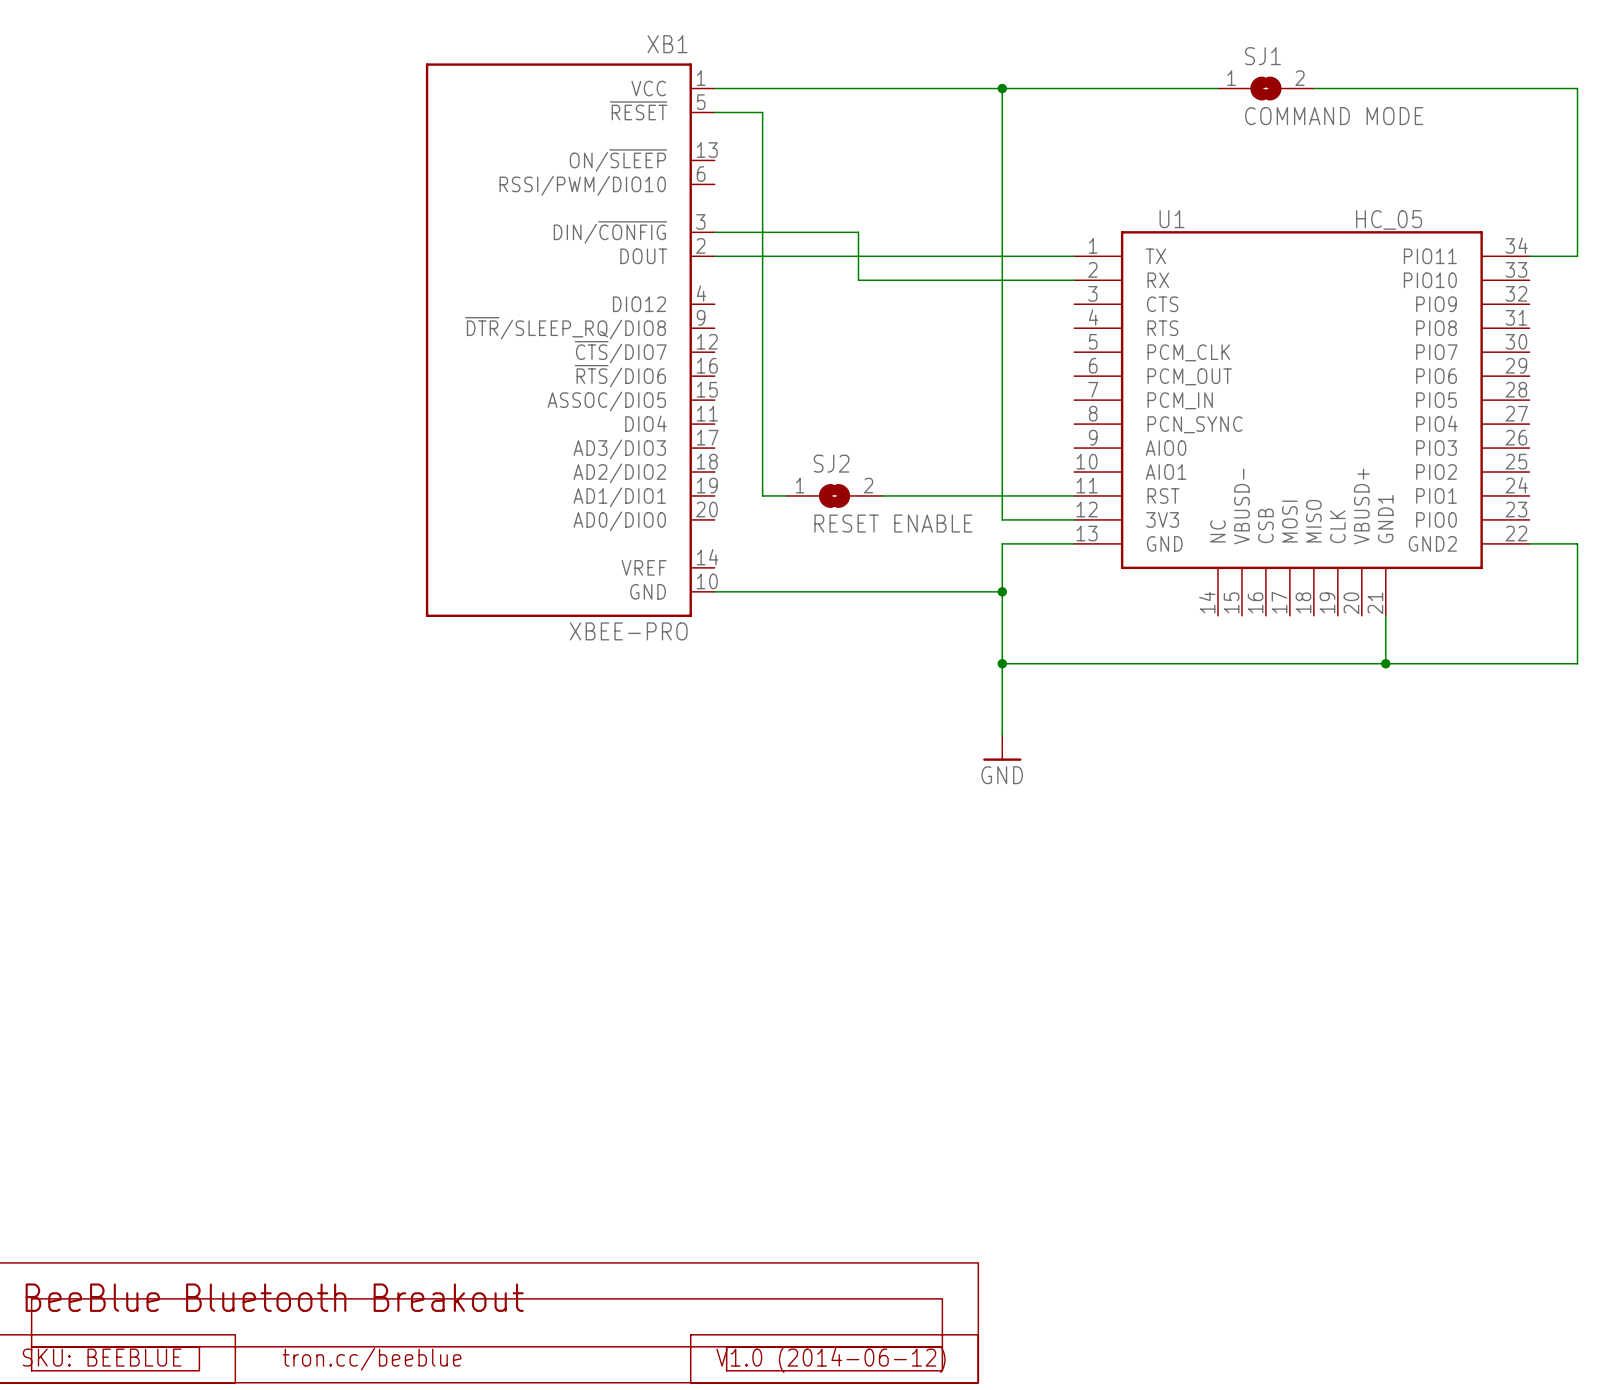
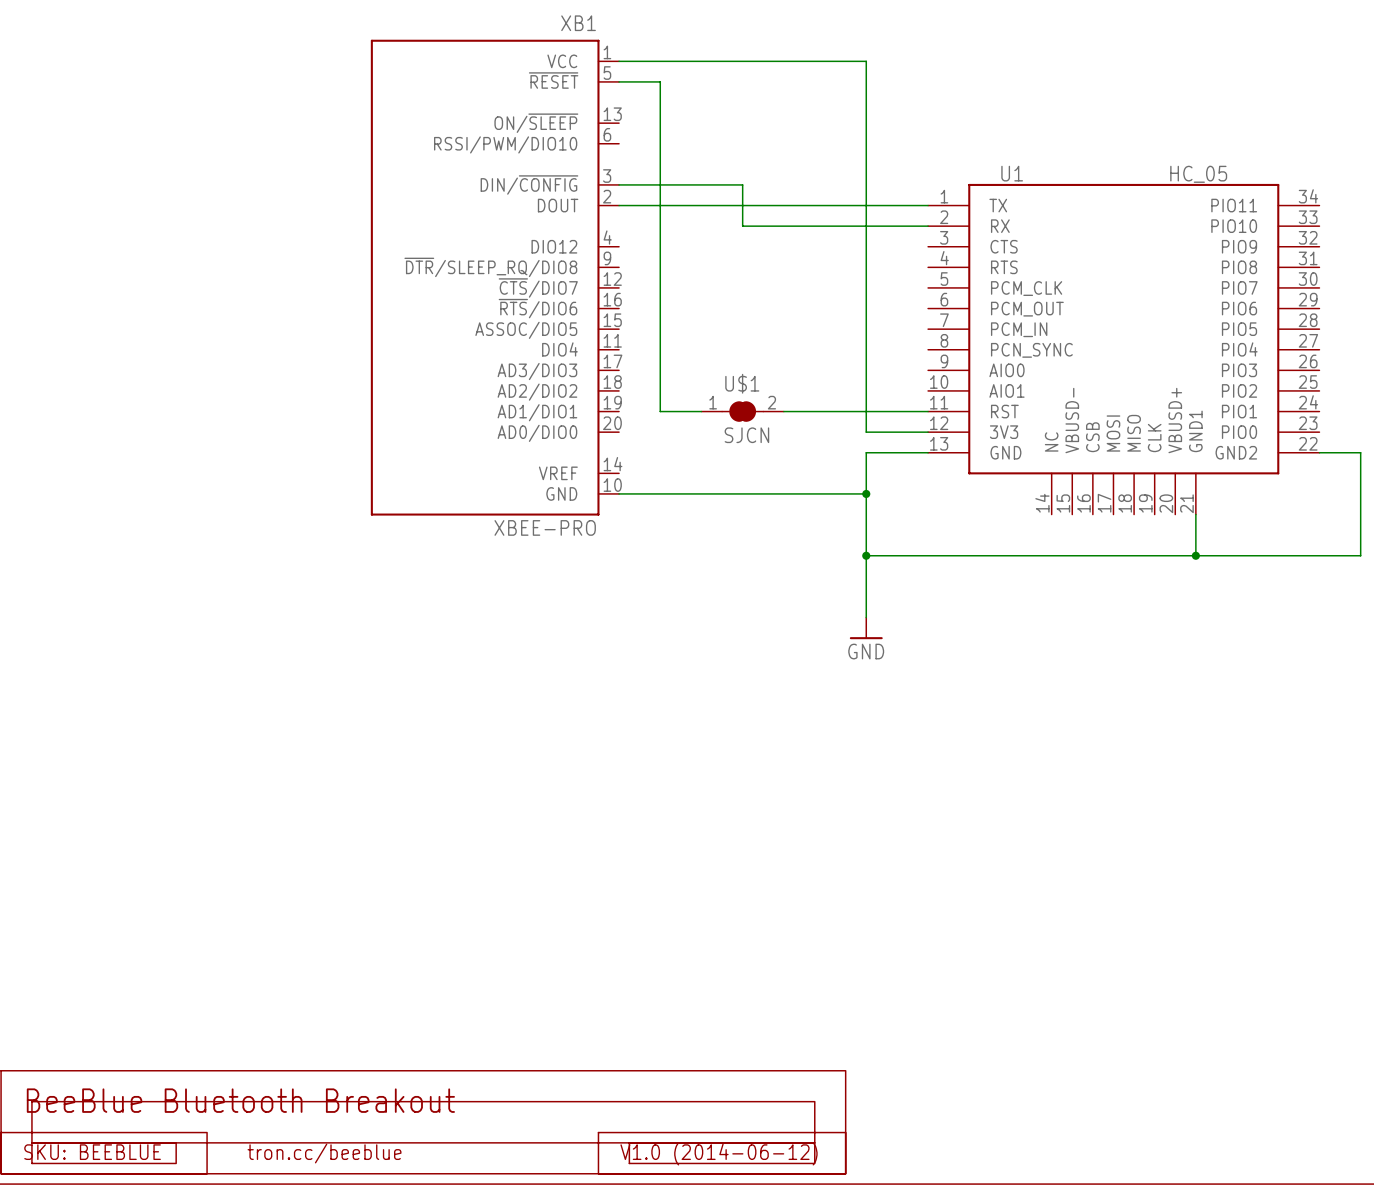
wire: (1002, 88) (1218, 88) -> none
junction: (1002, 88) -> none
SJ1: COMMAND MODE (1265, 88) -> none
wire: (1313, 88) (1577, 88) (1577, 256) (1529, 256) -> none
SJ2: RESET ENABLE (834, 495) -> none
U$1: none -> SJCN (742, 411)

